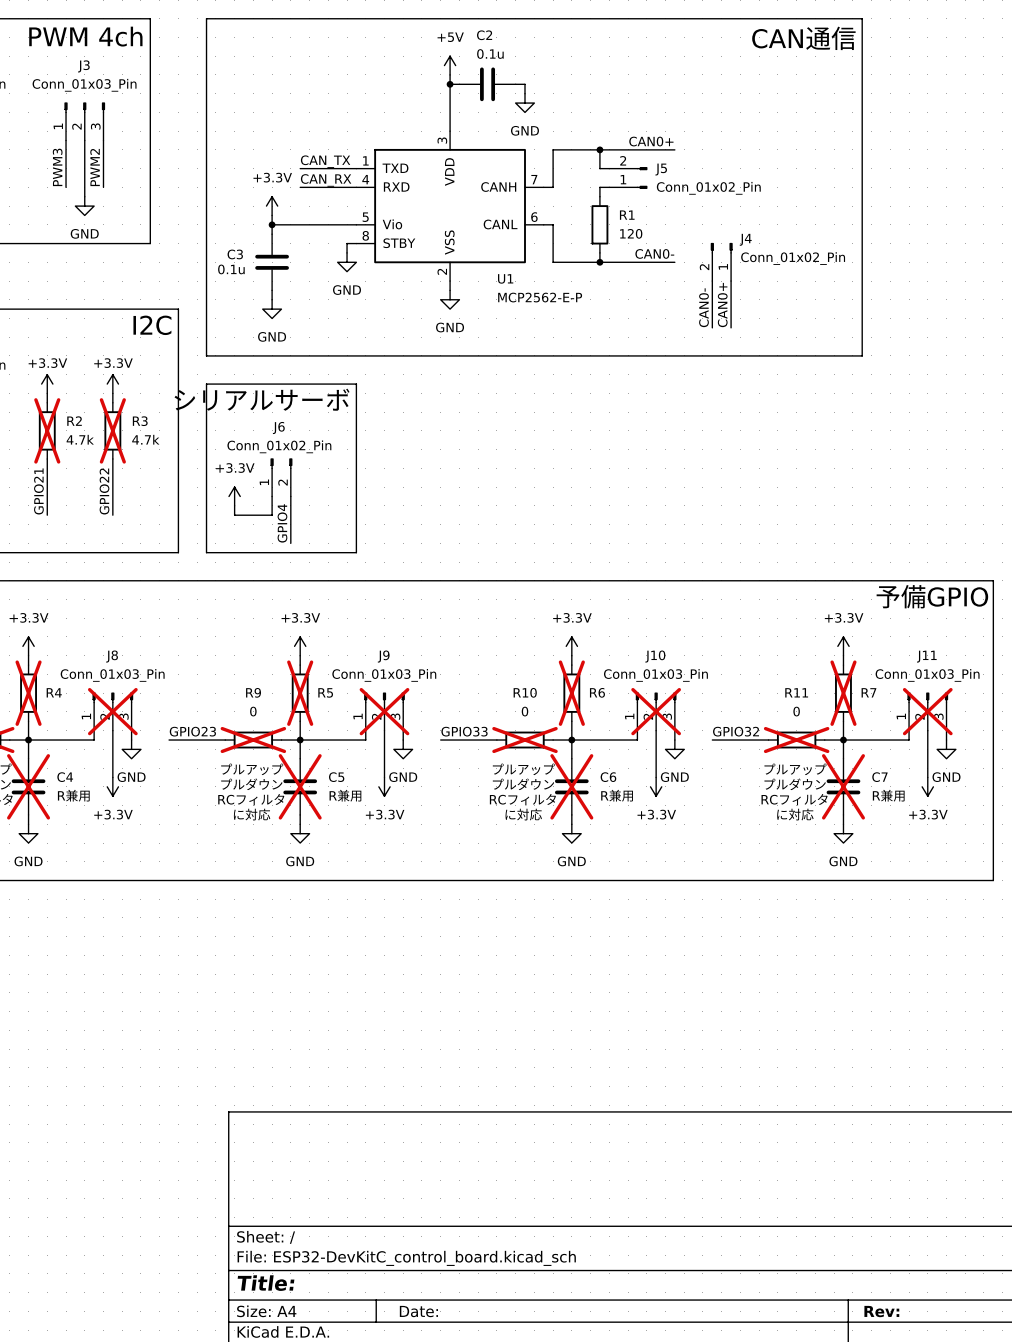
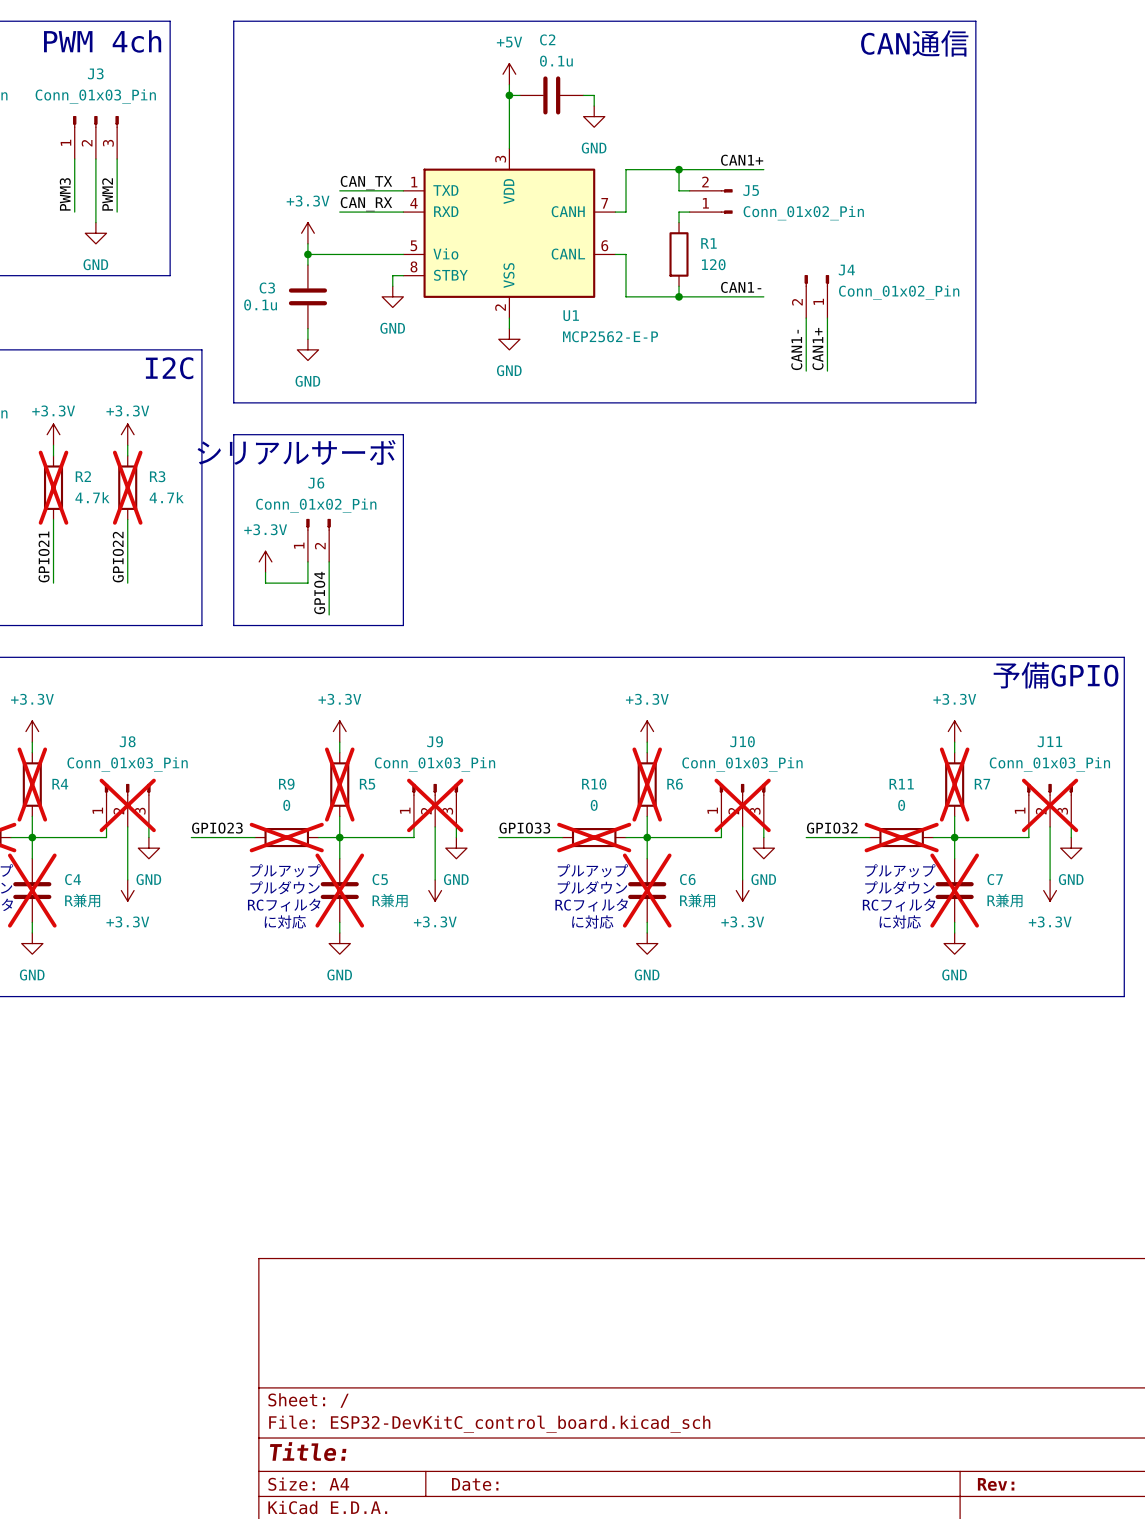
label: CAN0+ (651, 141) -> CAN1+ (742, 160)
label: CAN0- (654, 253) -> CAN1- (741, 287)
label: CAN0+ (722, 305) -> CAN1+ (817, 349)
label: CAN0- (703, 307) -> CAN1- (796, 349)

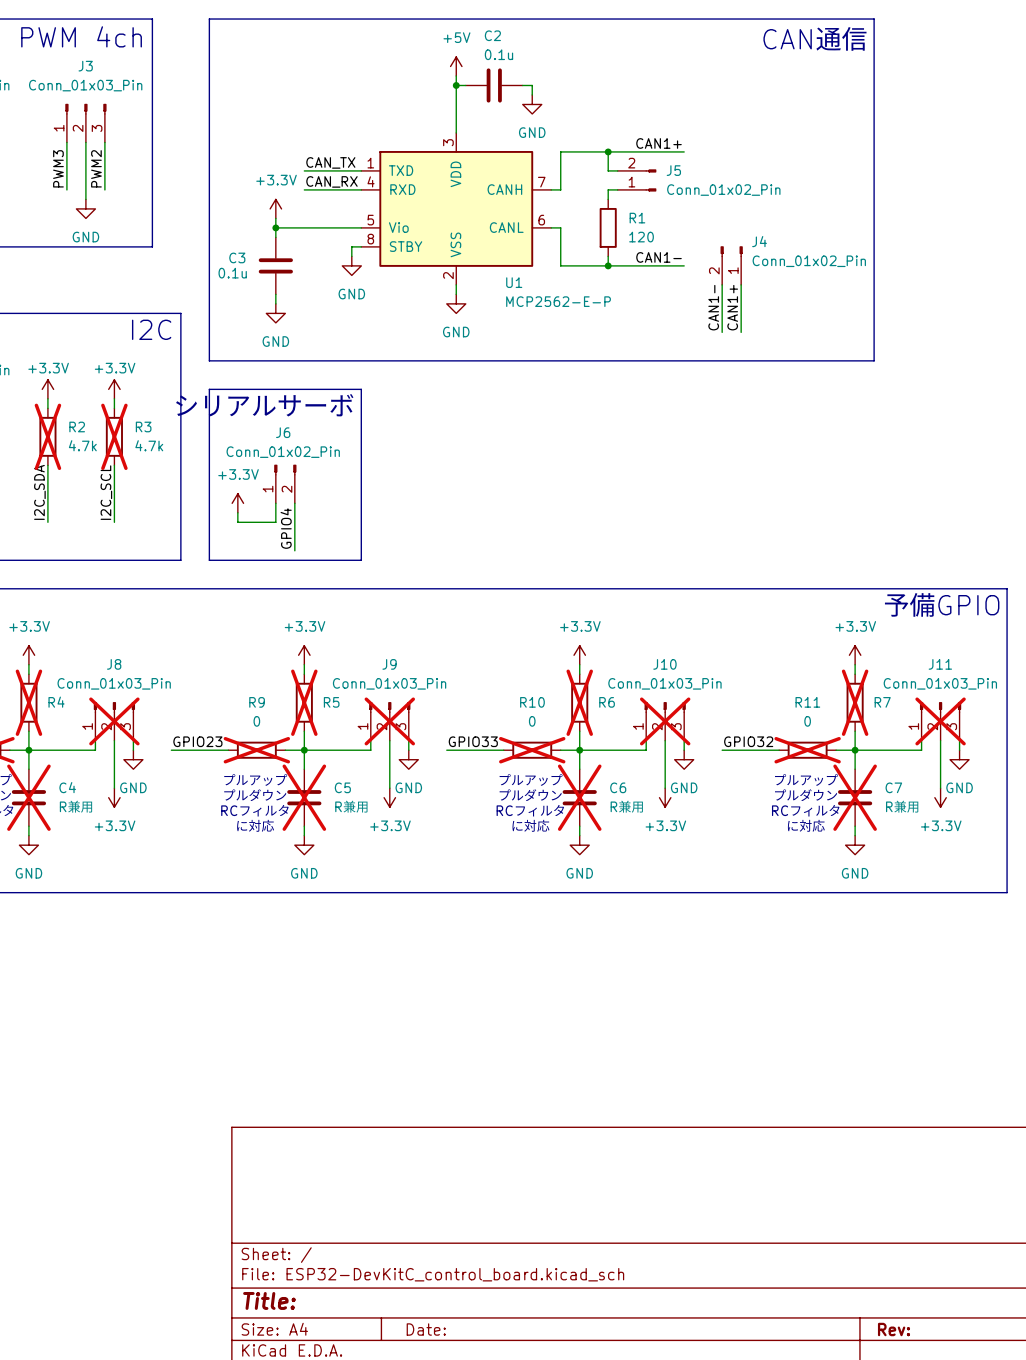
label: GPIO21 (44, 556) -> I2C_SDA (39, 492)
label: GPIO22 (118, 557) -> I2C_SCL (106, 492)

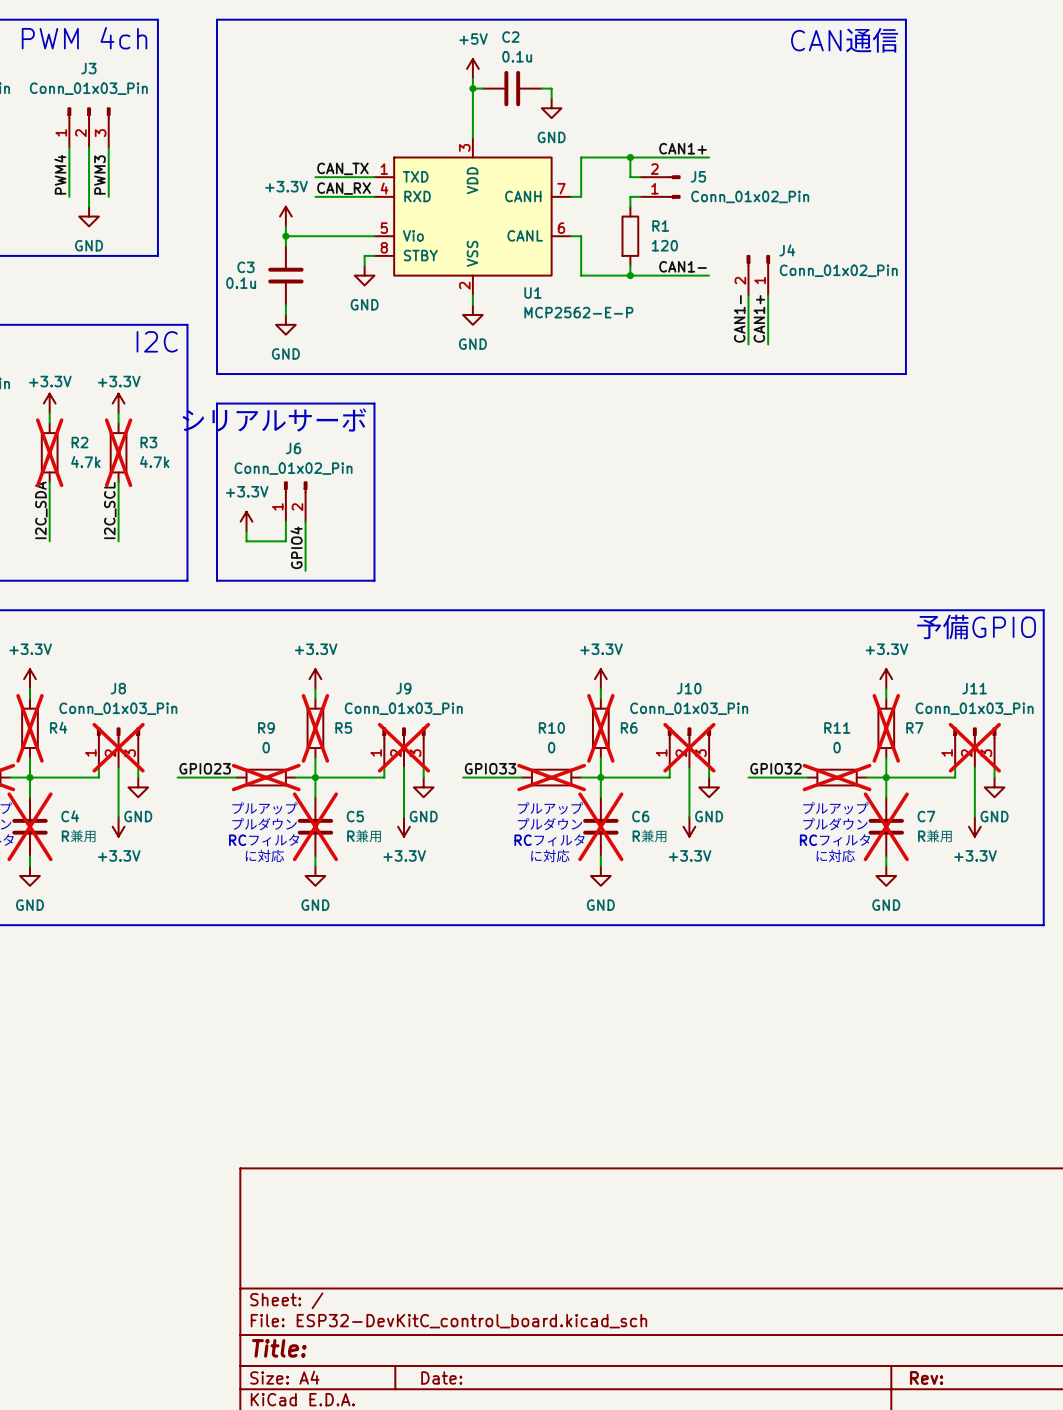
label: PWM3 (58, 168) -> PWM4 (60, 174)
label: PWM2 (96, 168) -> PWM3 (99, 174)

